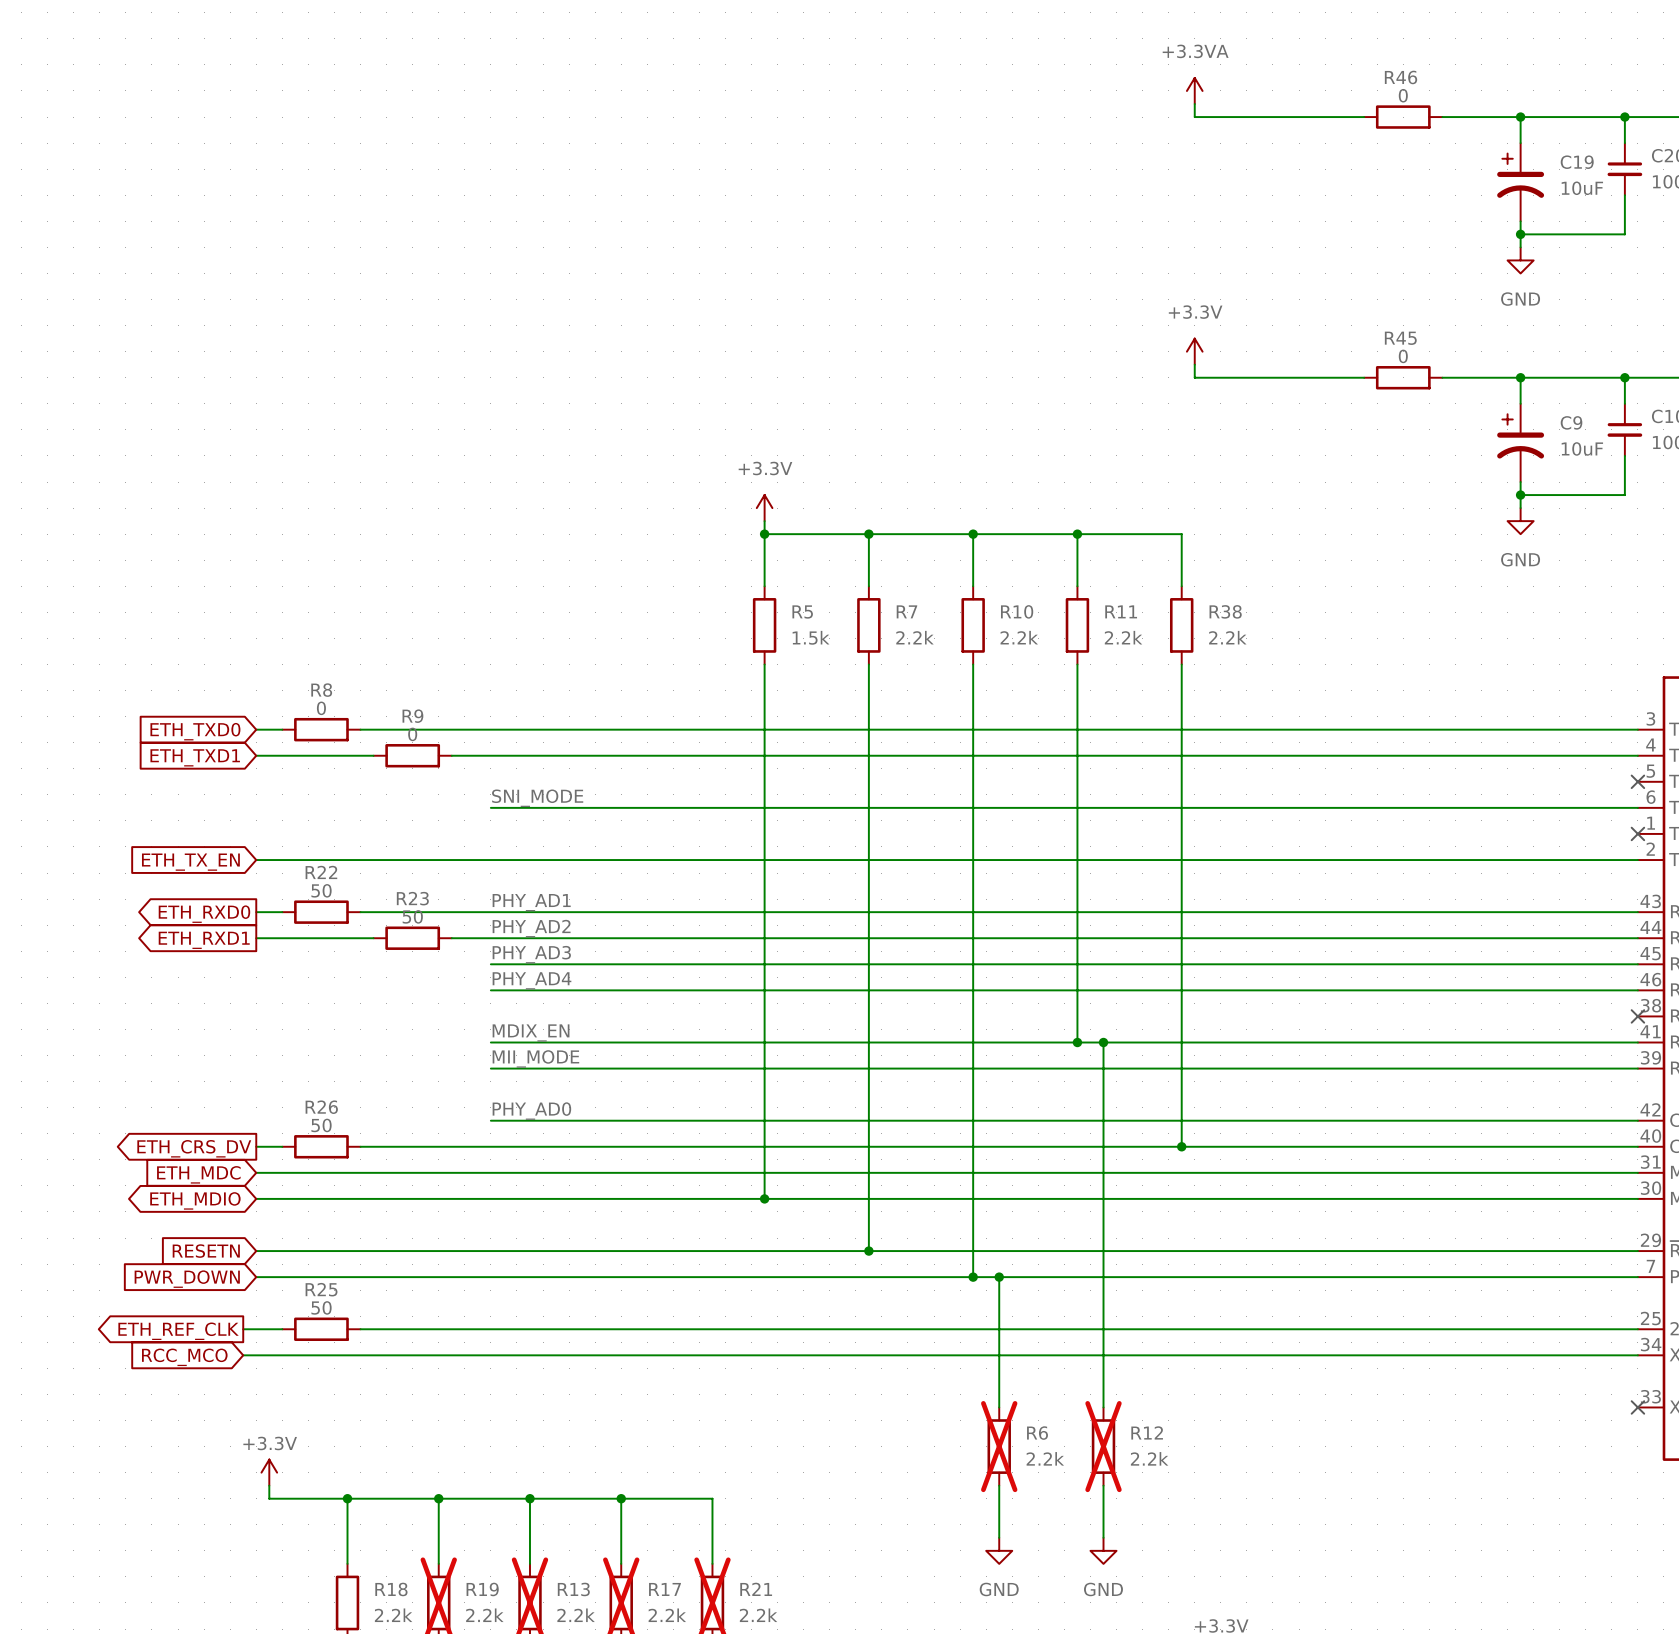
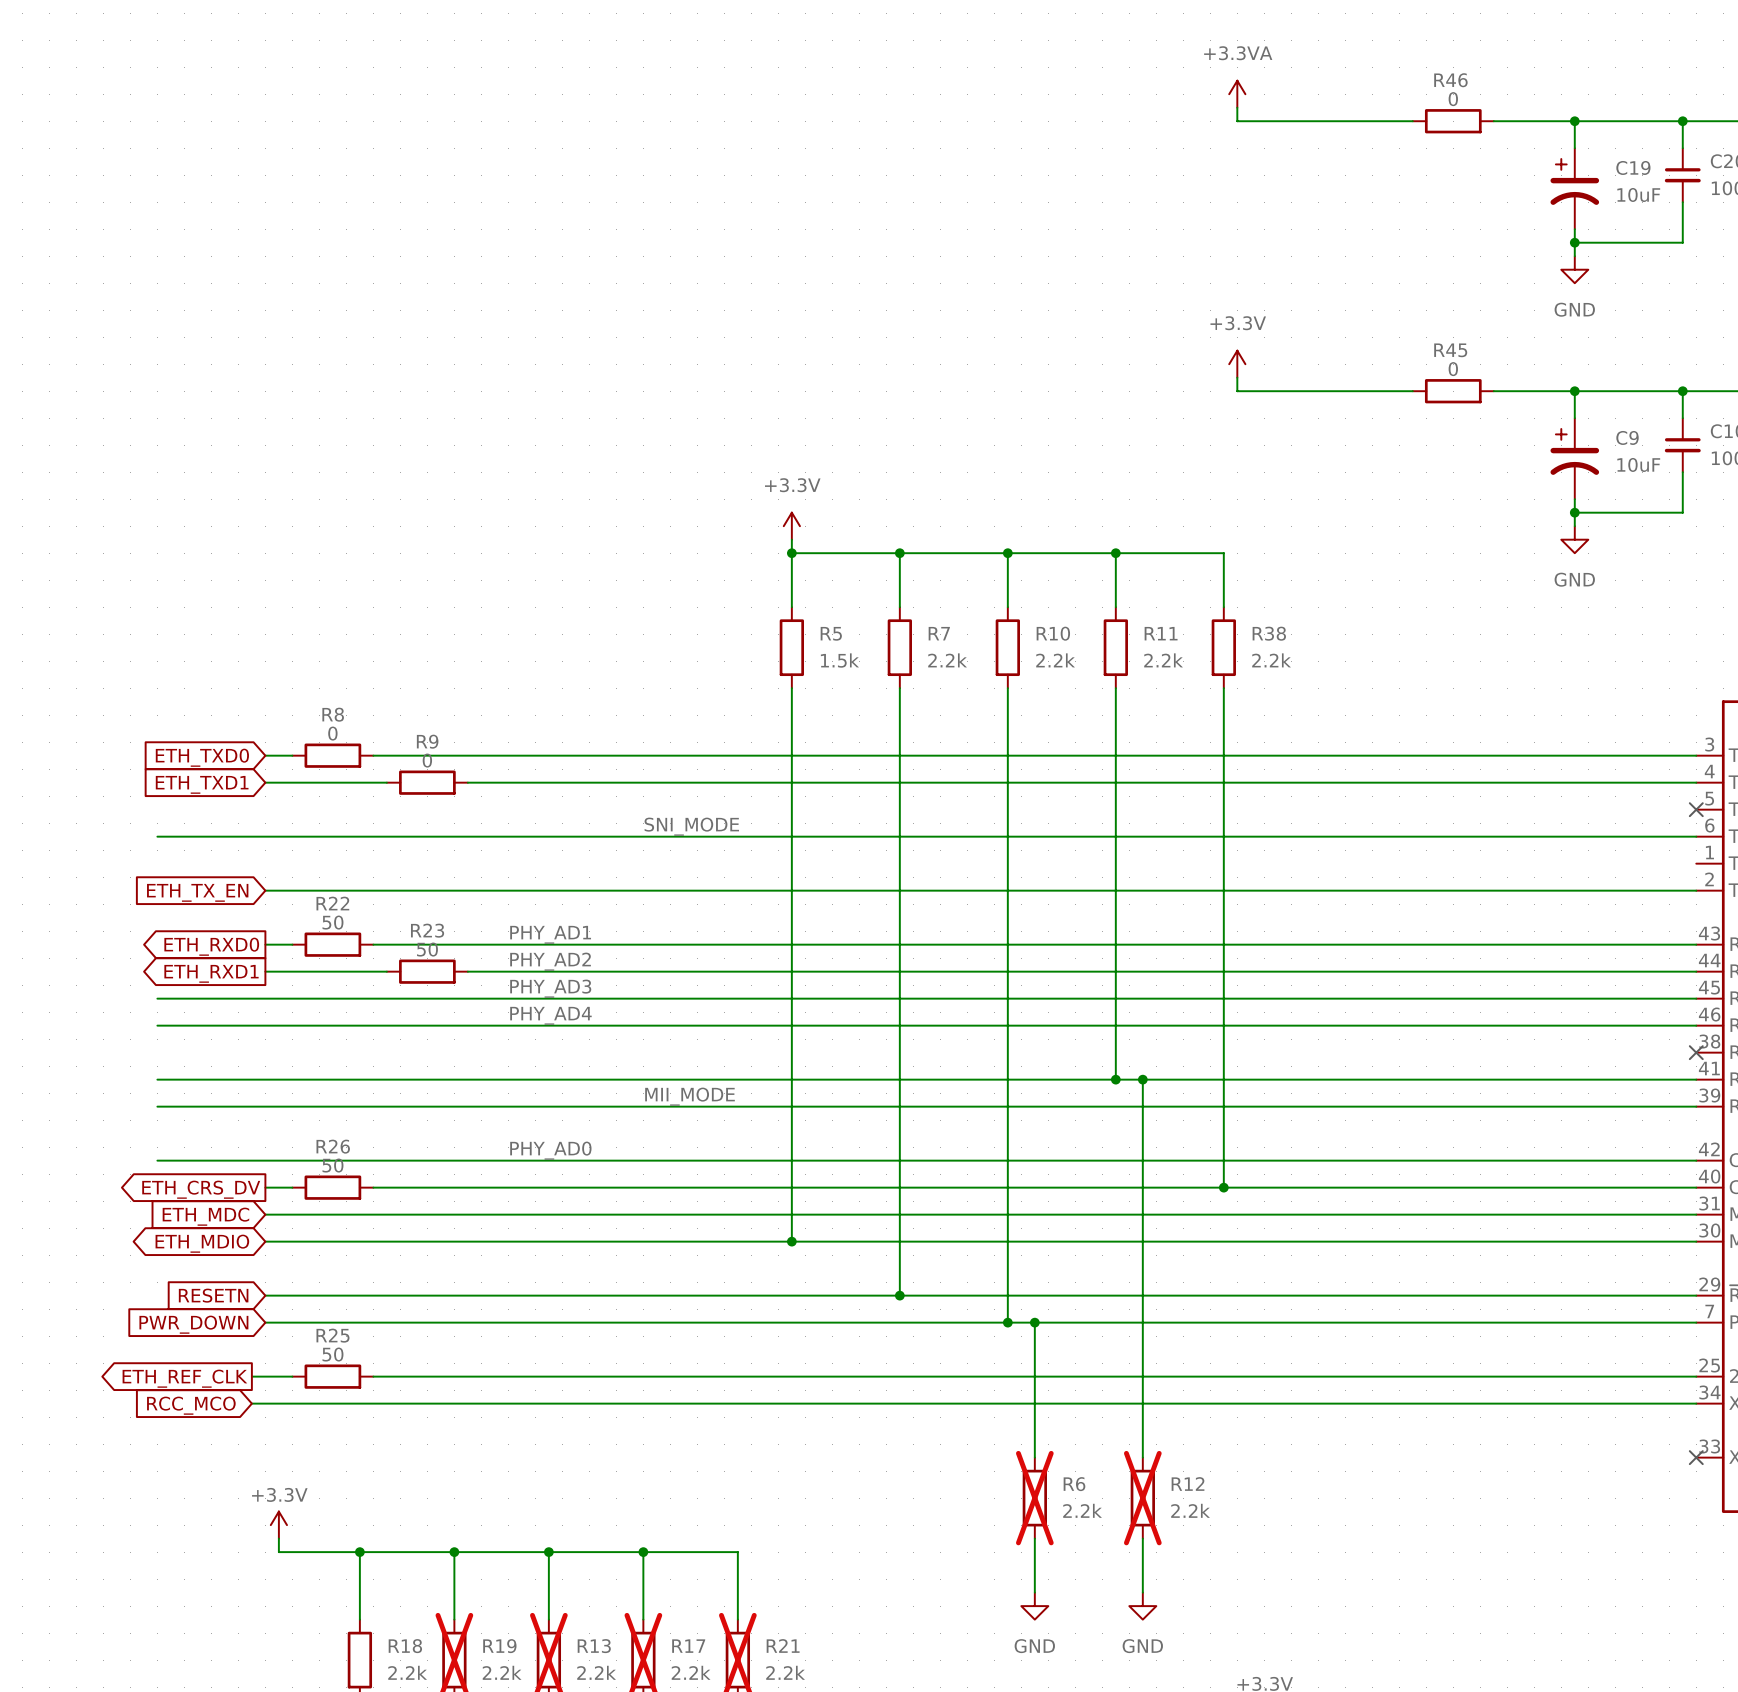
label position: SNI_MODE (537, 798) -> SNI_MODE (691, 826)
wire: none -> (157, 836) (508, 836)
no-connect mark: (1637, 833) -> none
wire: none -> (157, 998) (508, 998)
wire: none -> (157, 1025) (508, 1025)
label: MDIX_EN (531, 1032) -> none
wire: none -> (157, 1079) (508, 1079)
label position: MII_MODE (535, 1058) -> MII_MODE (690, 1096)
wire: none -> (157, 1106) (508, 1106)
wire: none -> (157, 1160) (508, 1160)

